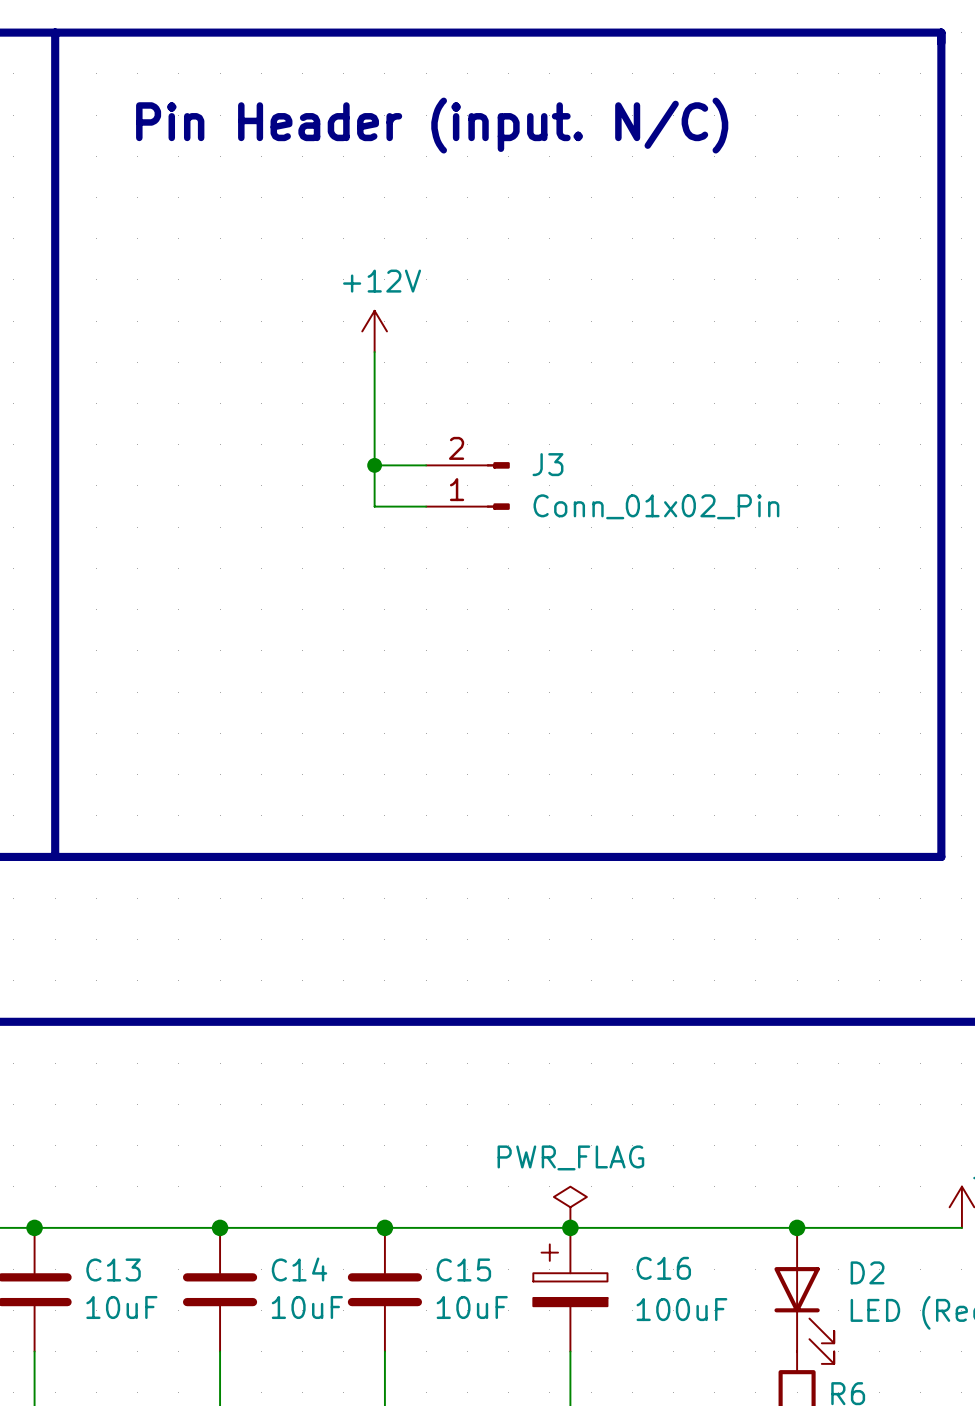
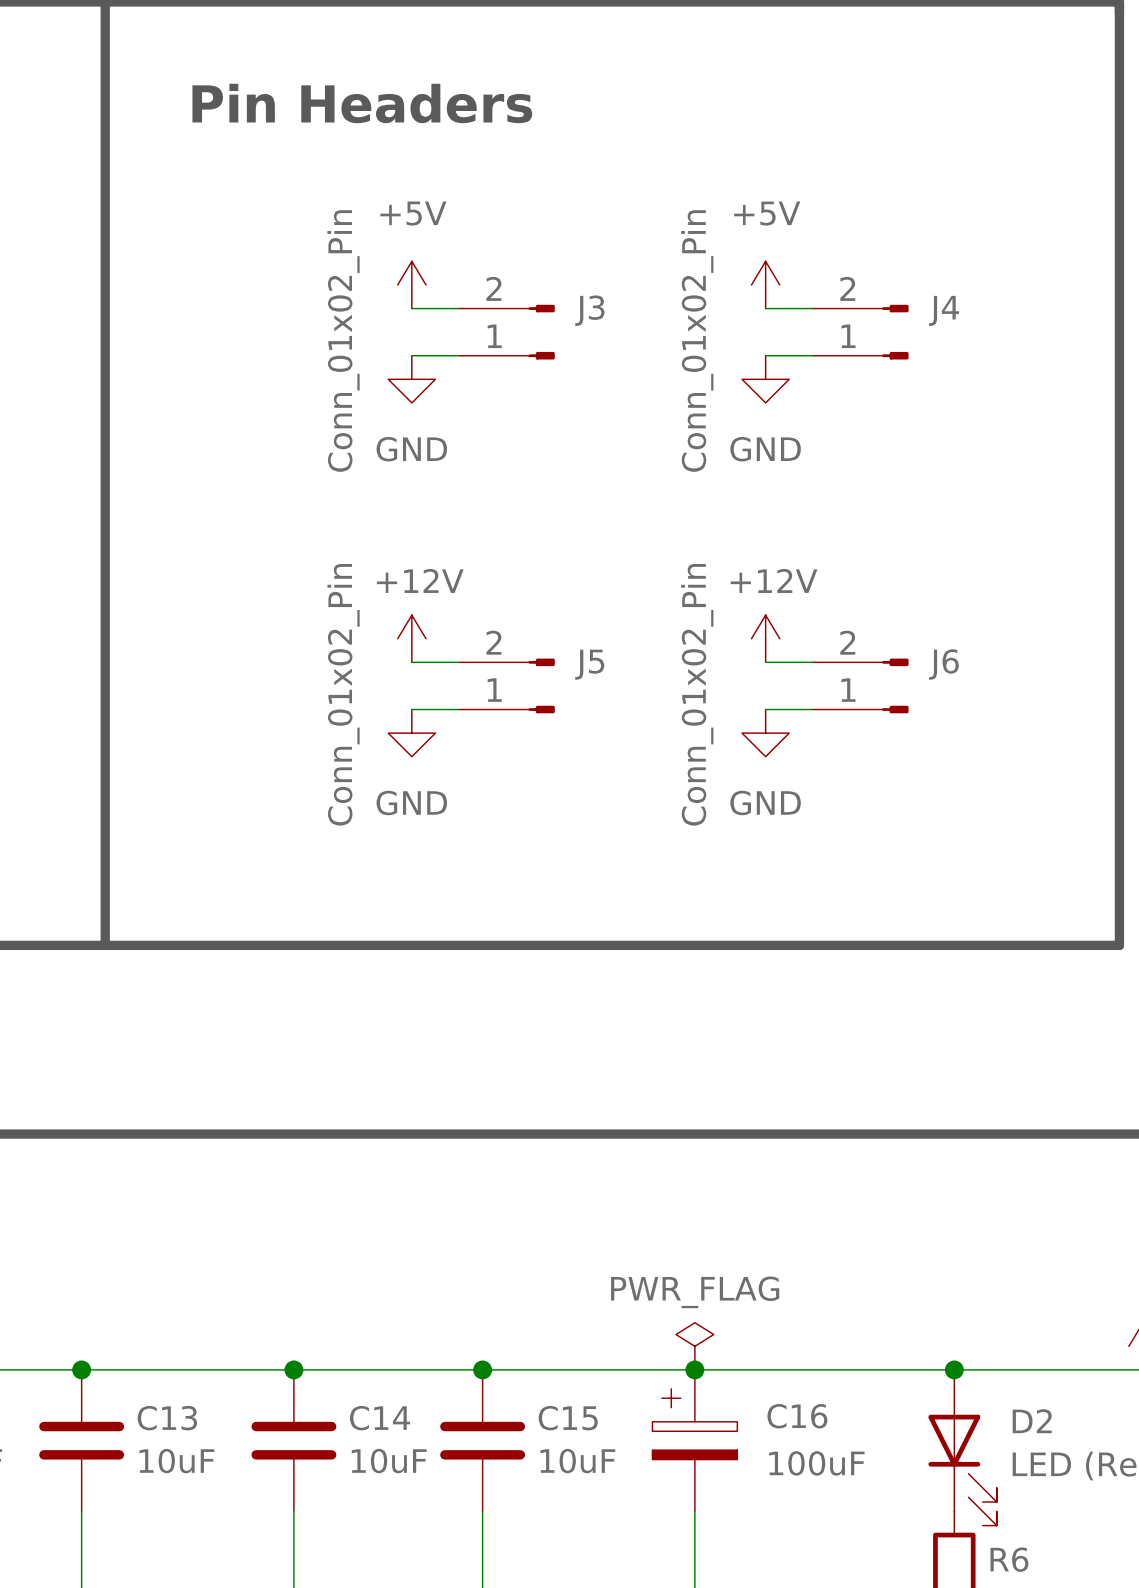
text: Pin Header (input. N/C) (432, 125) -> Pin Headers (362, 103)
power symbol: none -> +5V (411, 284)
power symbol: none -> +5V (765, 284)
wire: none -> (411, 308) (459, 308)
wire: none -> (765, 308) (812, 308)
J4: none -> Conn_01x02_Pin (860, 332)
power symbol: +12V (374, 331) -> none
wire: none -> (411, 355) (459, 355)
wire: none -> (765, 355) (812, 355)
wire: (374, 352) (374, 506) (426, 506) -> none
power symbol: none -> GND (411, 379)
power symbol: none -> GND (765, 379)
wire: (374, 465) (426, 465) -> none
junction: (374, 465) -> none
J3 position: (467, 485) -> (506, 332)
J3 value rotation: 0° (656, 506) -> 90° counterclockwise (343, 341)
J3 value position: Conn_01x02_Pin (656, 506) -> Conn_01x02_Pin (343, 341)
power symbol: none -> +12V (411, 638)
power symbol: none -> +12V (765, 638)
wire: none -> (411, 662) (459, 662)
wire: none -> (765, 662) (812, 662)
J5: none -> Conn_01x02_Pin (506, 685)
J6: none -> Conn_01x02_Pin (860, 685)
wire: none -> (411, 709) (459, 709)
wire: none -> (765, 709) (812, 709)
power symbol: none -> GND (411, 733)
power symbol: none -> GND (765, 733)

